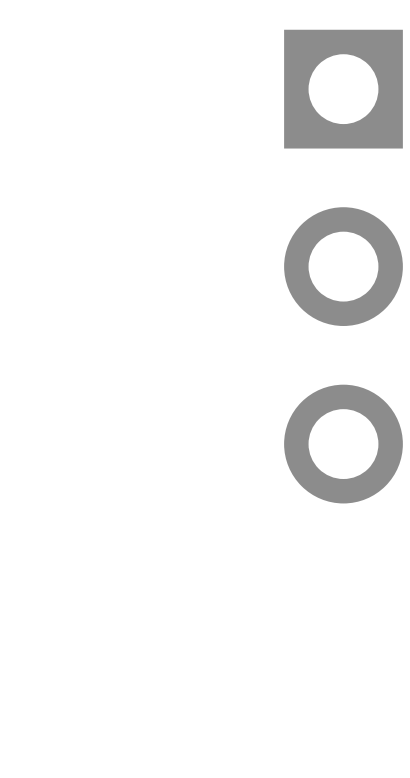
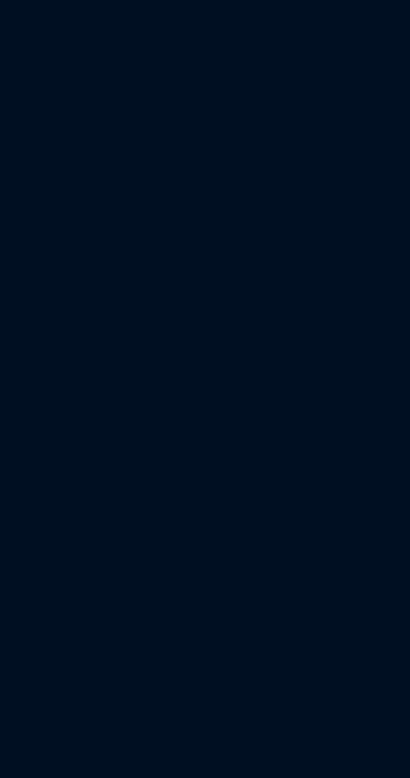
part: (343, 266) -> none

